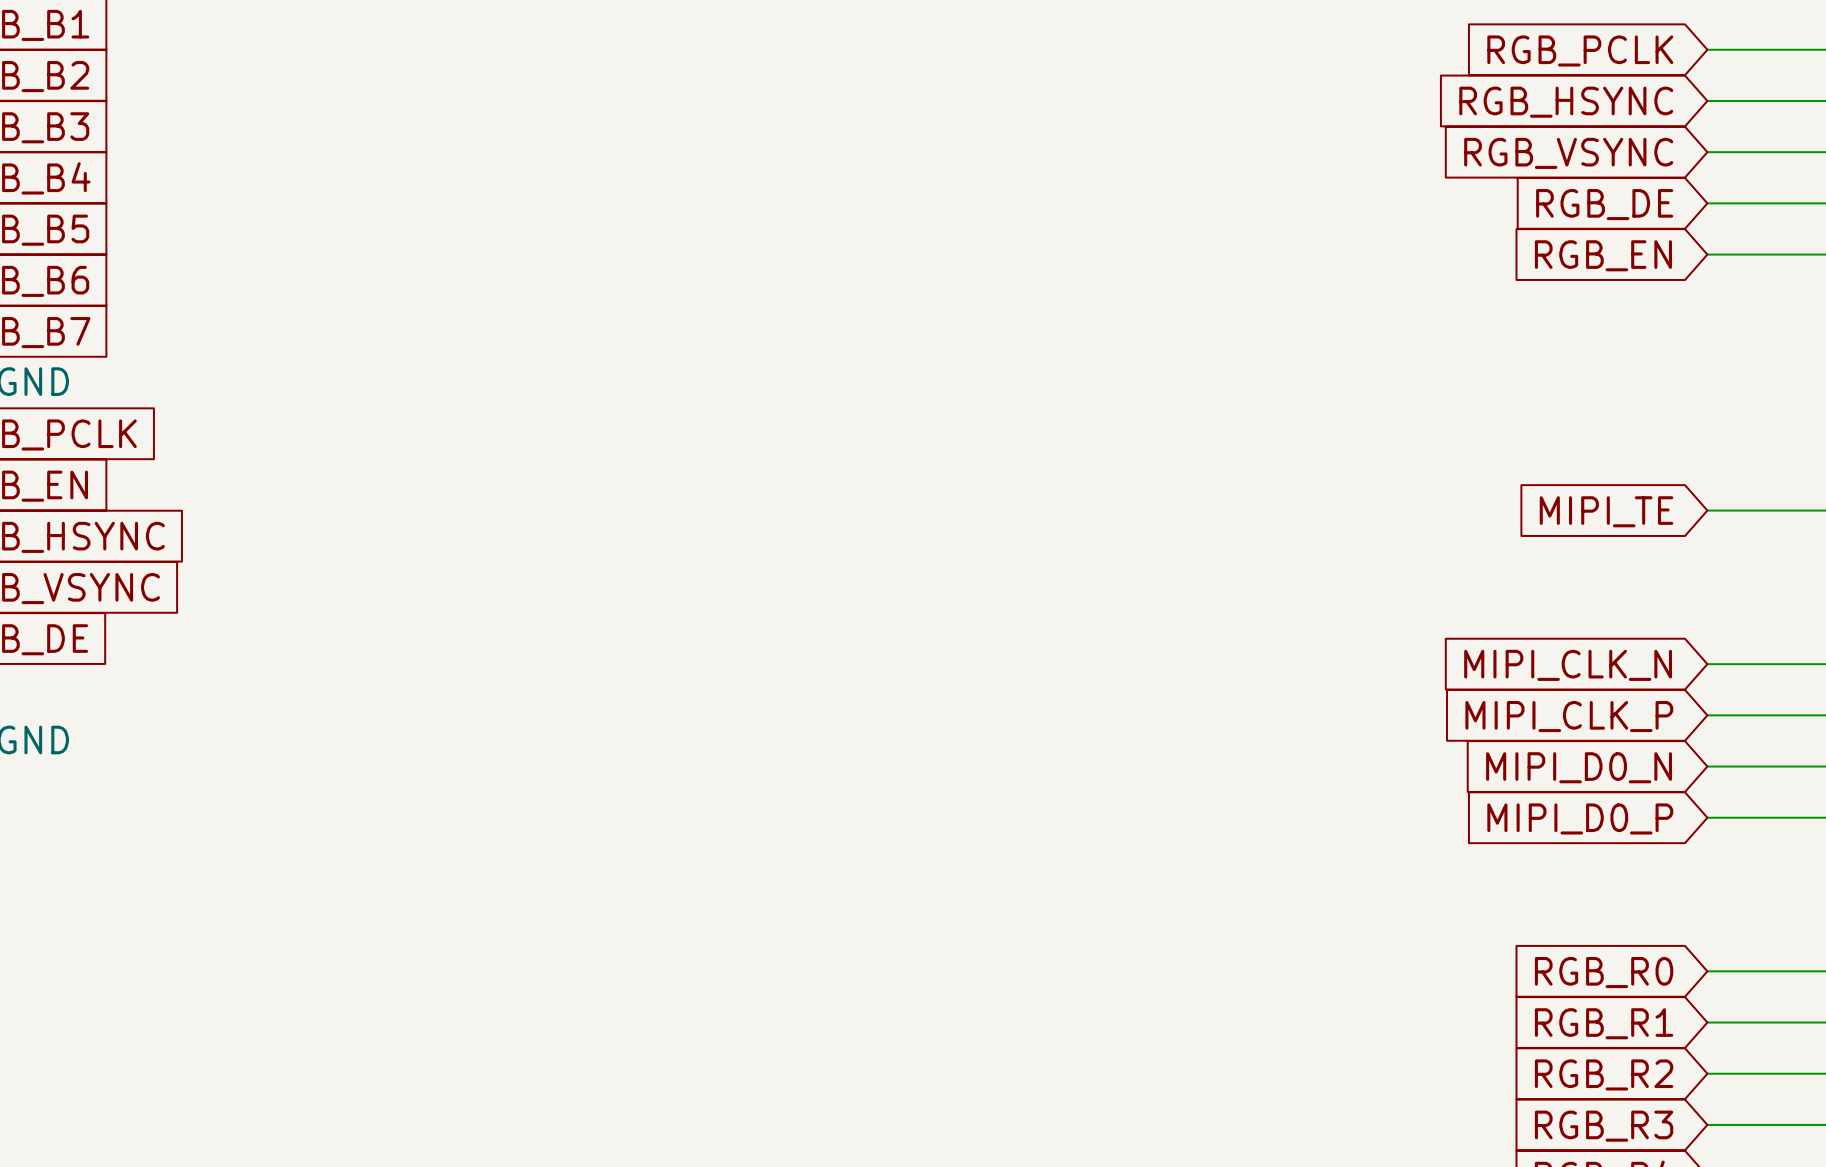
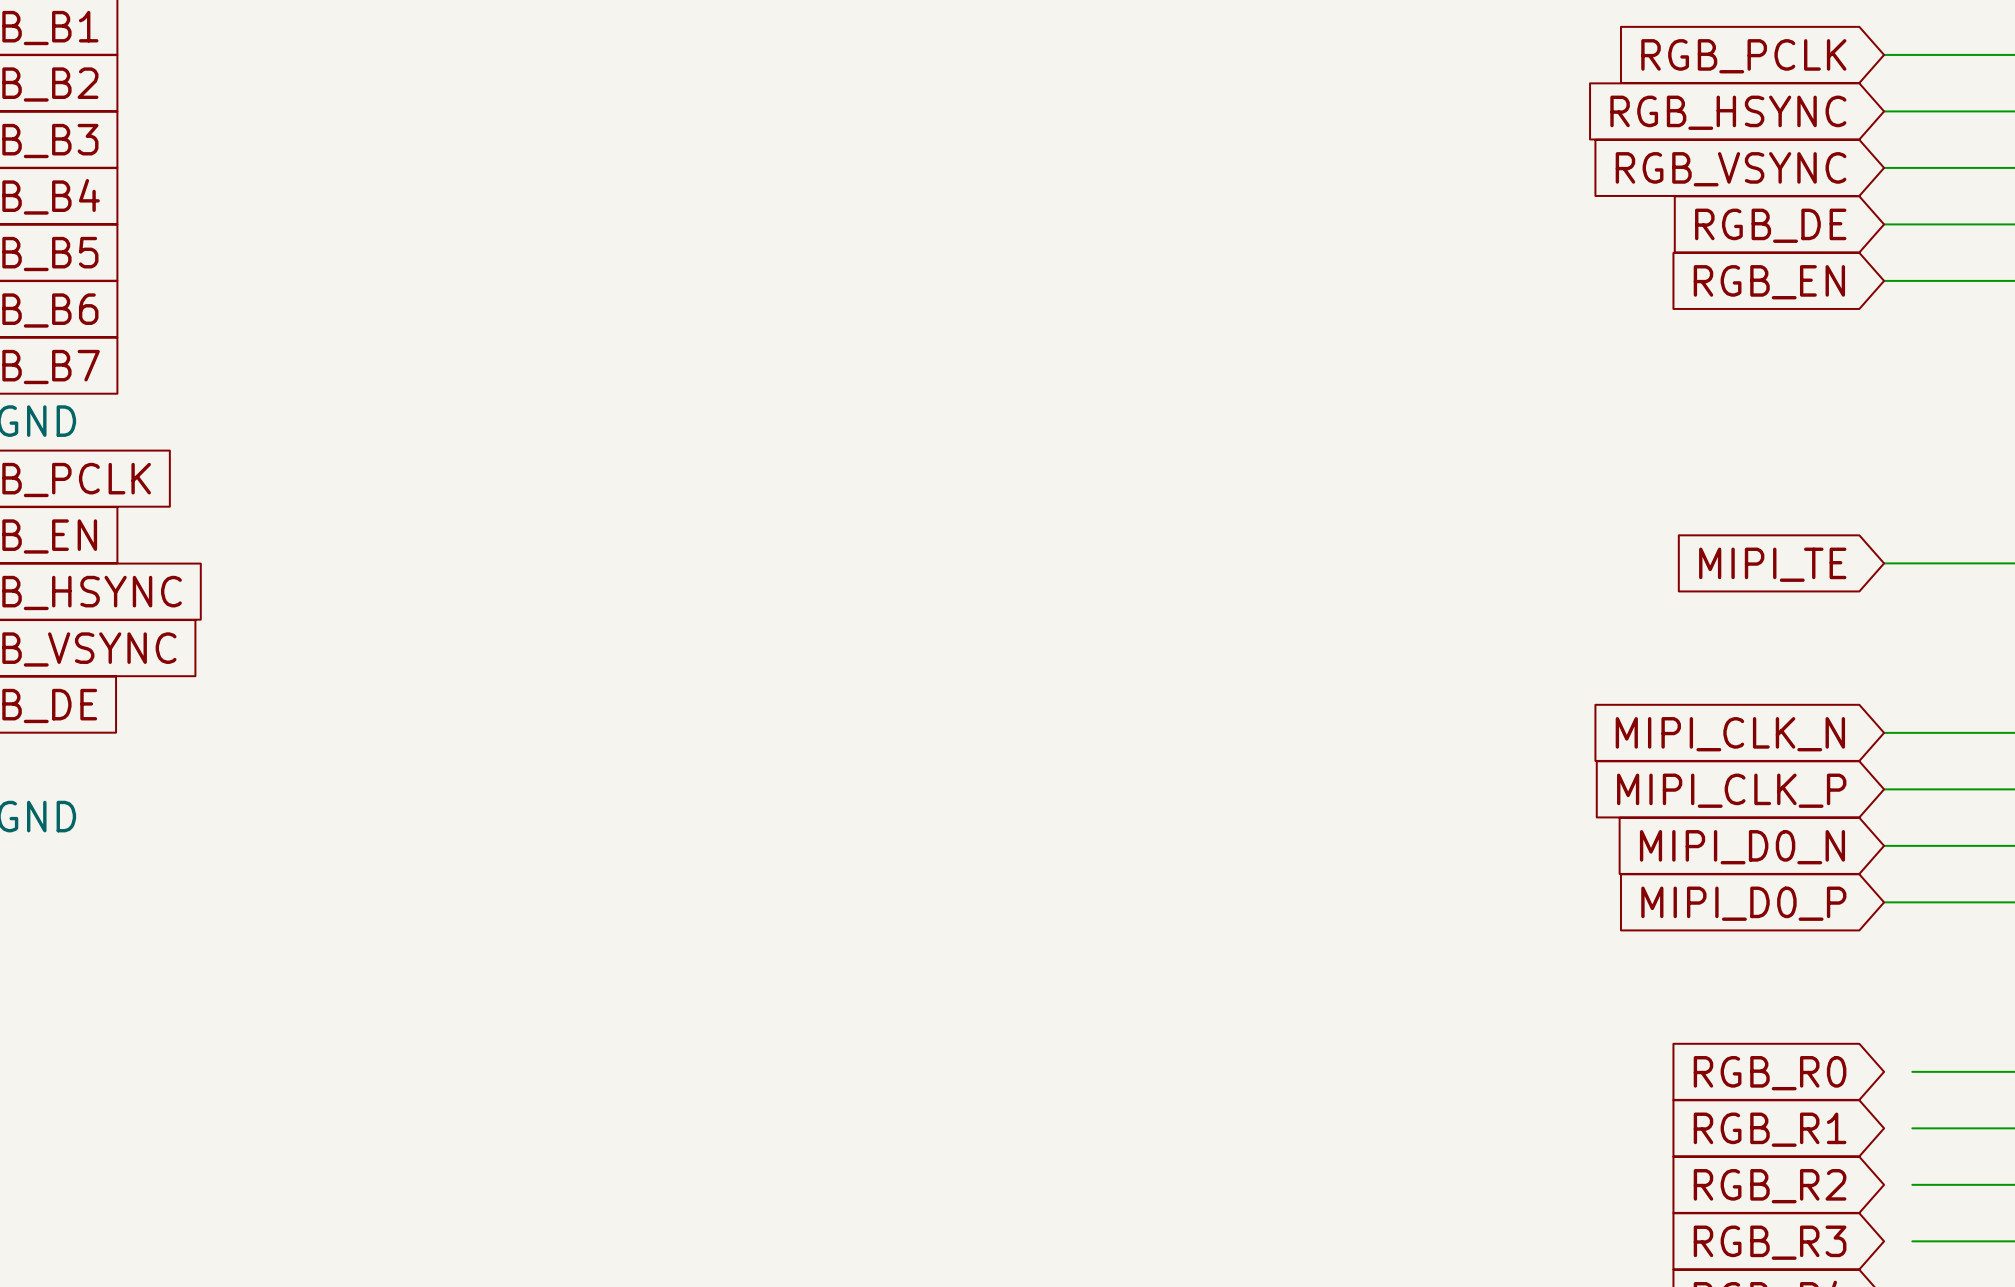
wire: (1707, 971) (1733, 971) -> none
wire: (1707, 1022) (1733, 1022) -> none
wire: (1707, 1073) (1733, 1073) -> none
wire: (1707, 1124) (1733, 1124) -> none

